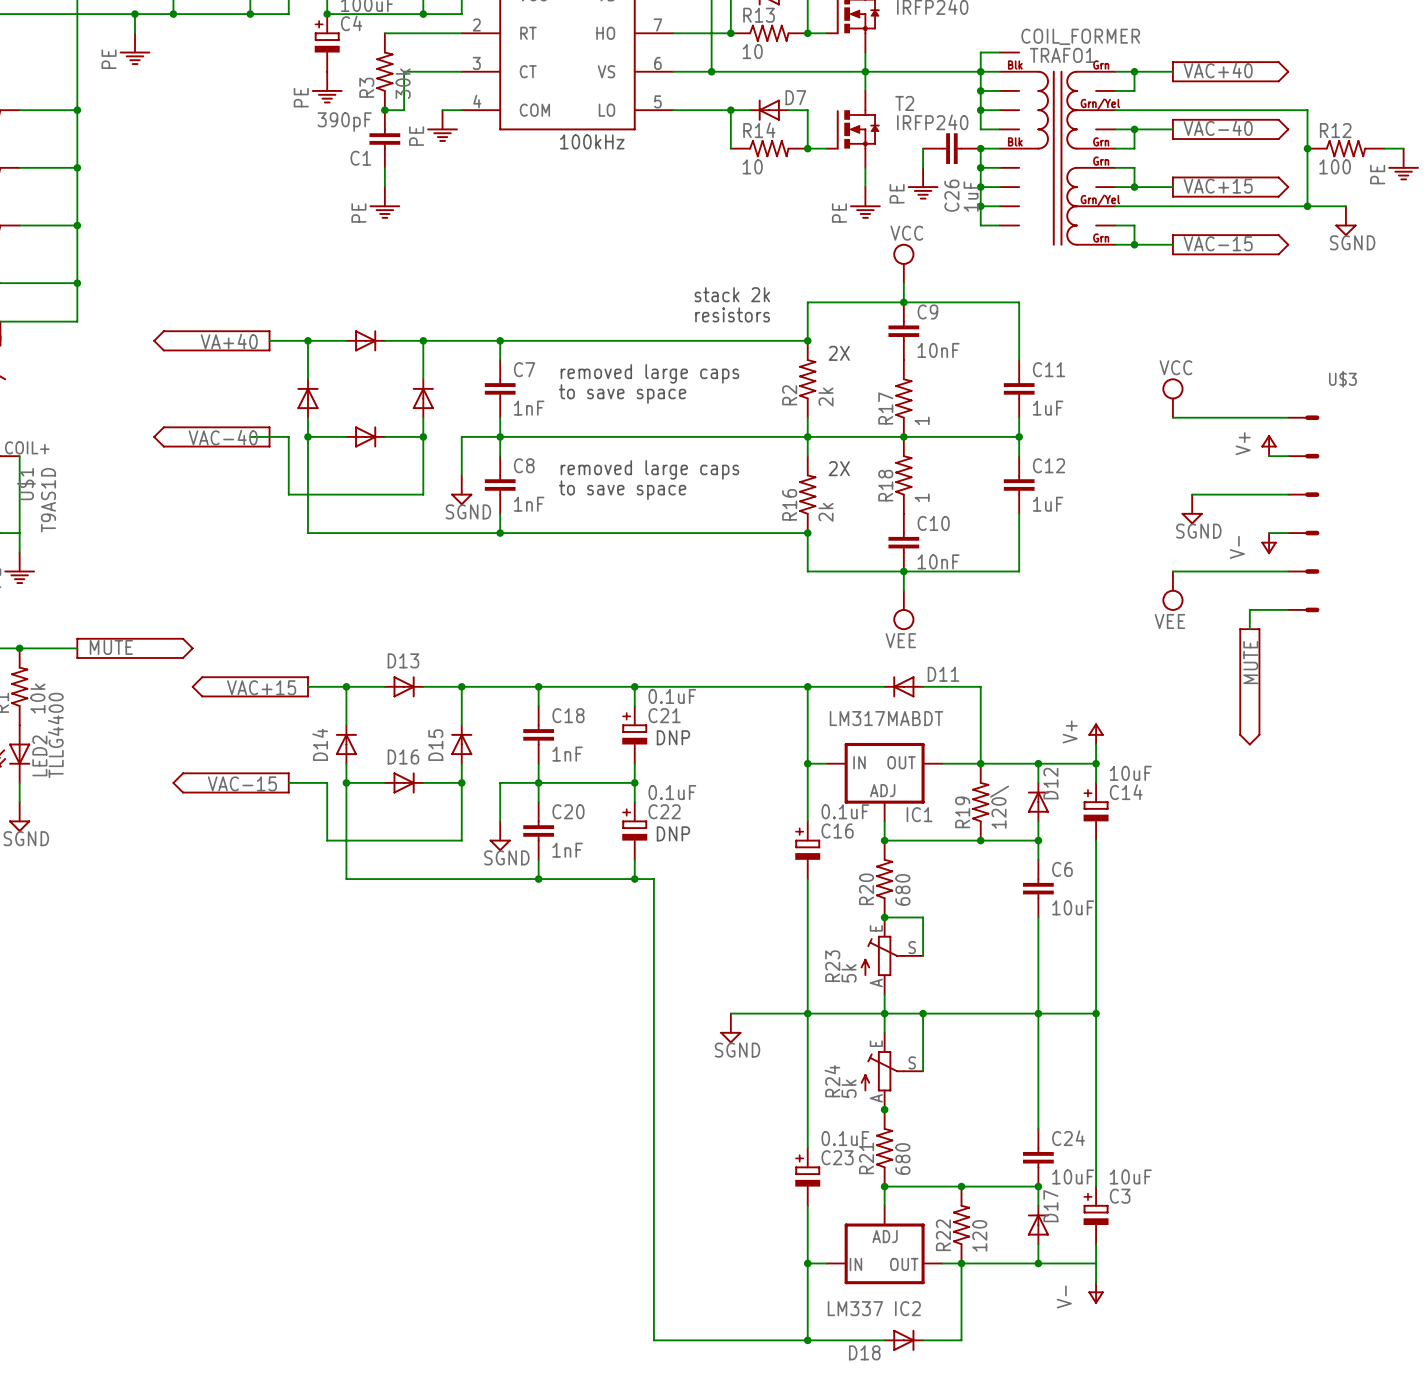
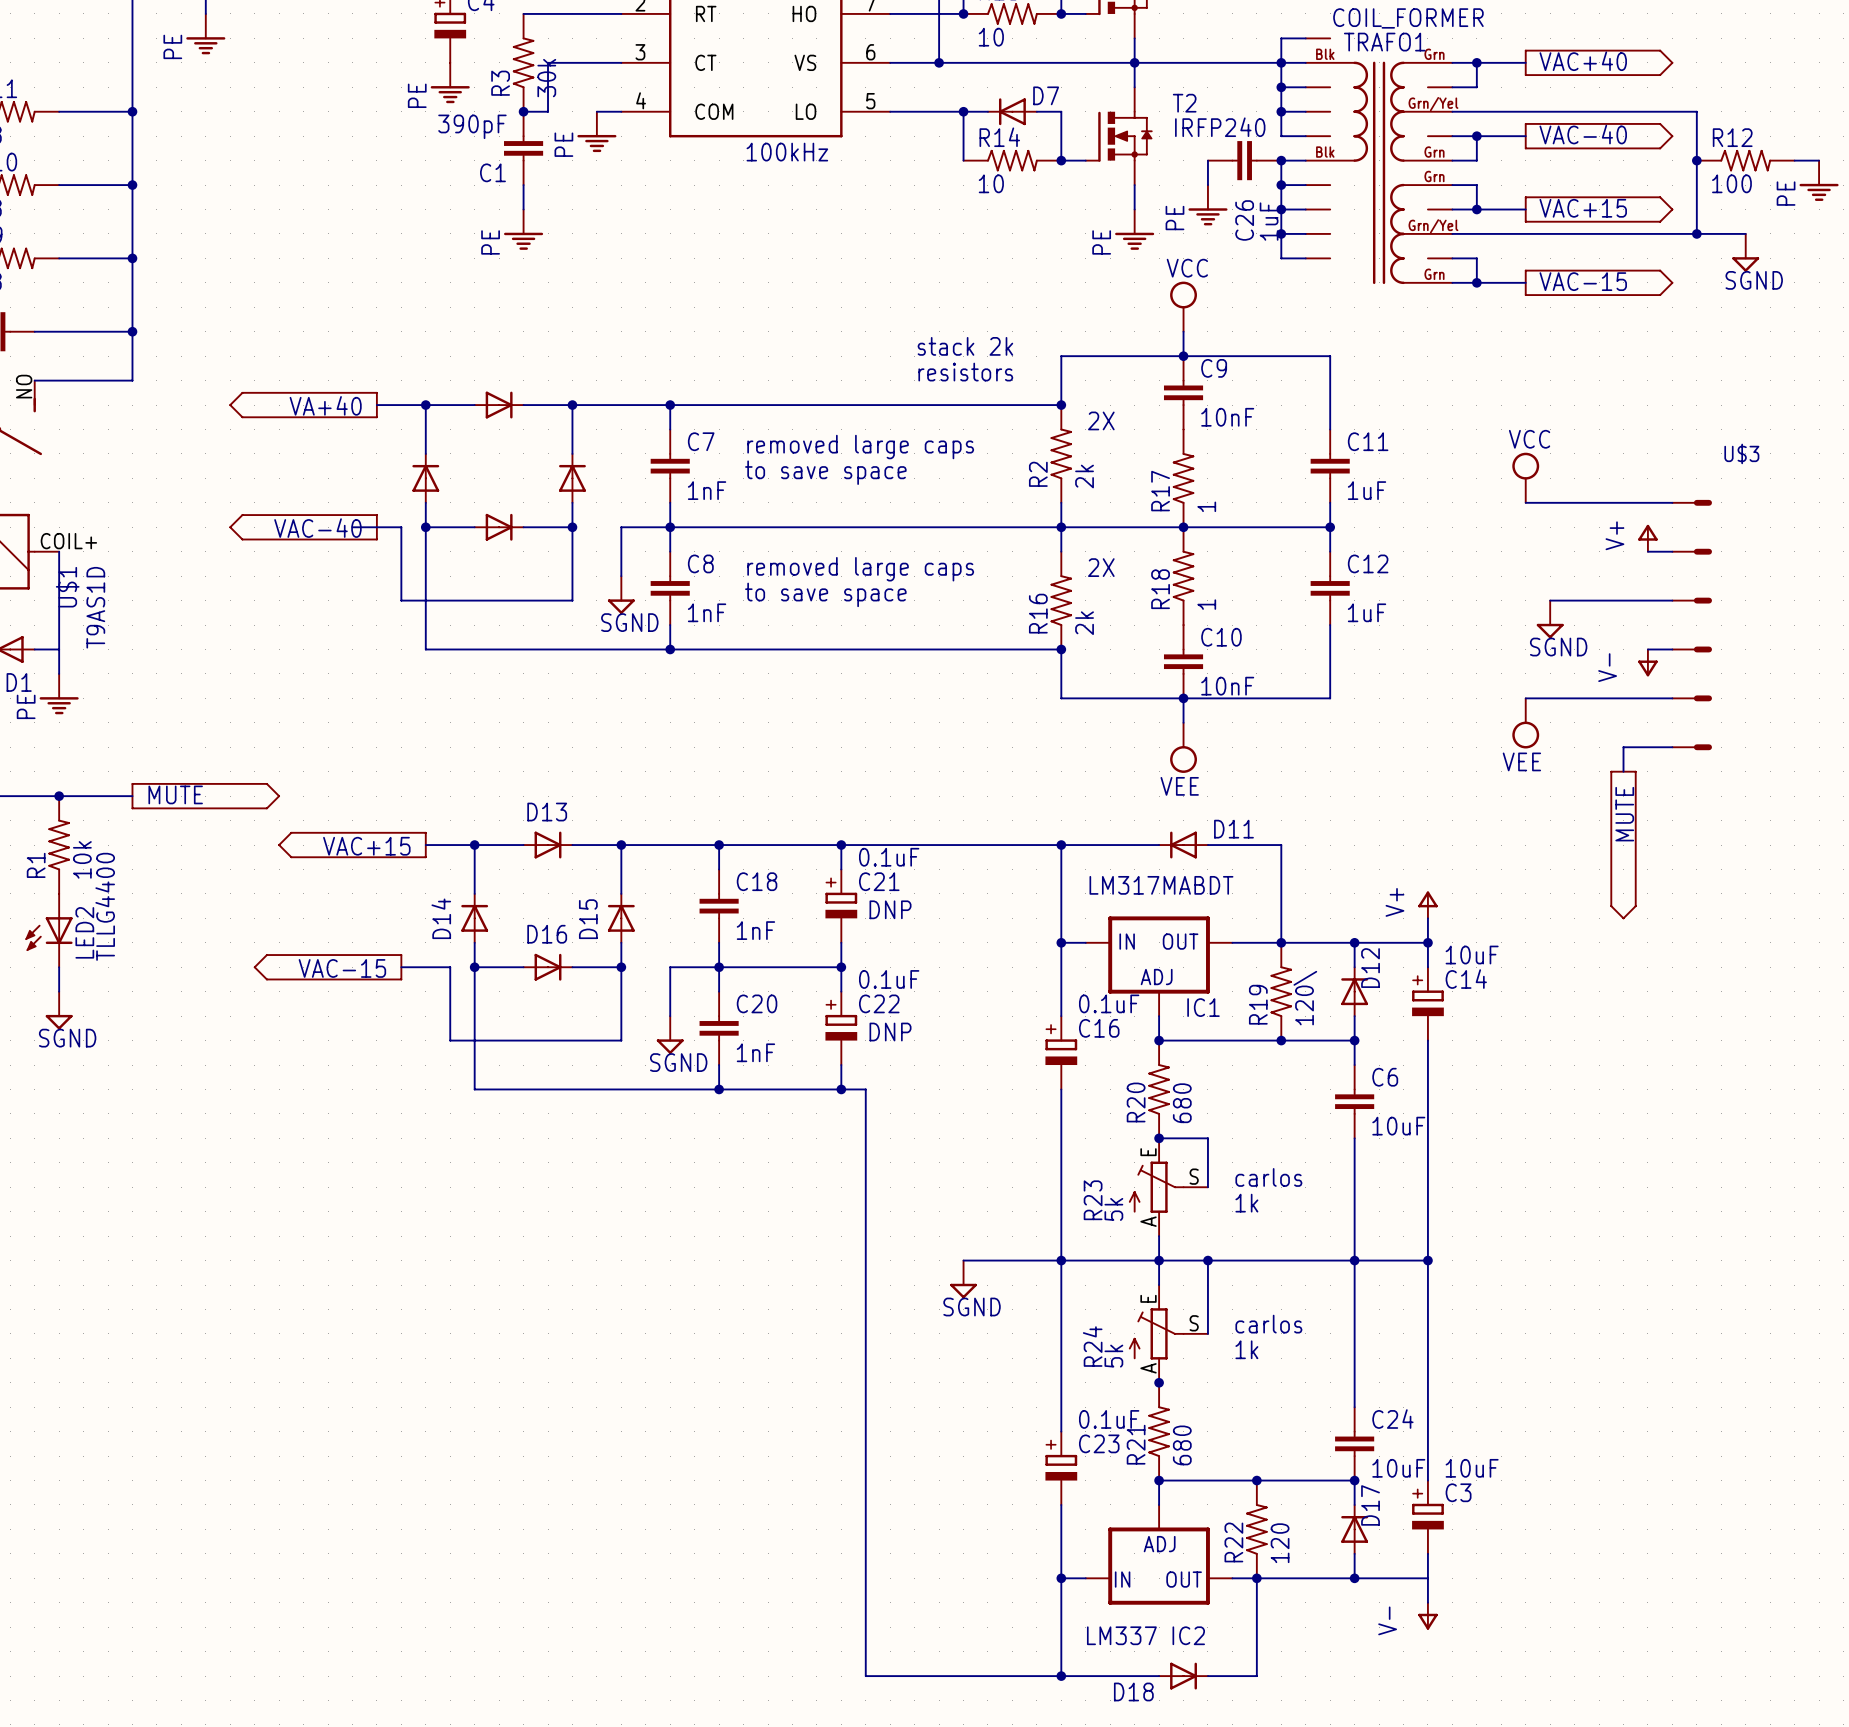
text: none -> carlos (1268, 1177)
text: none -> 1k (1246, 1203)
text: none -> carlos (1268, 1324)
text: none -> 1k (1246, 1349)

